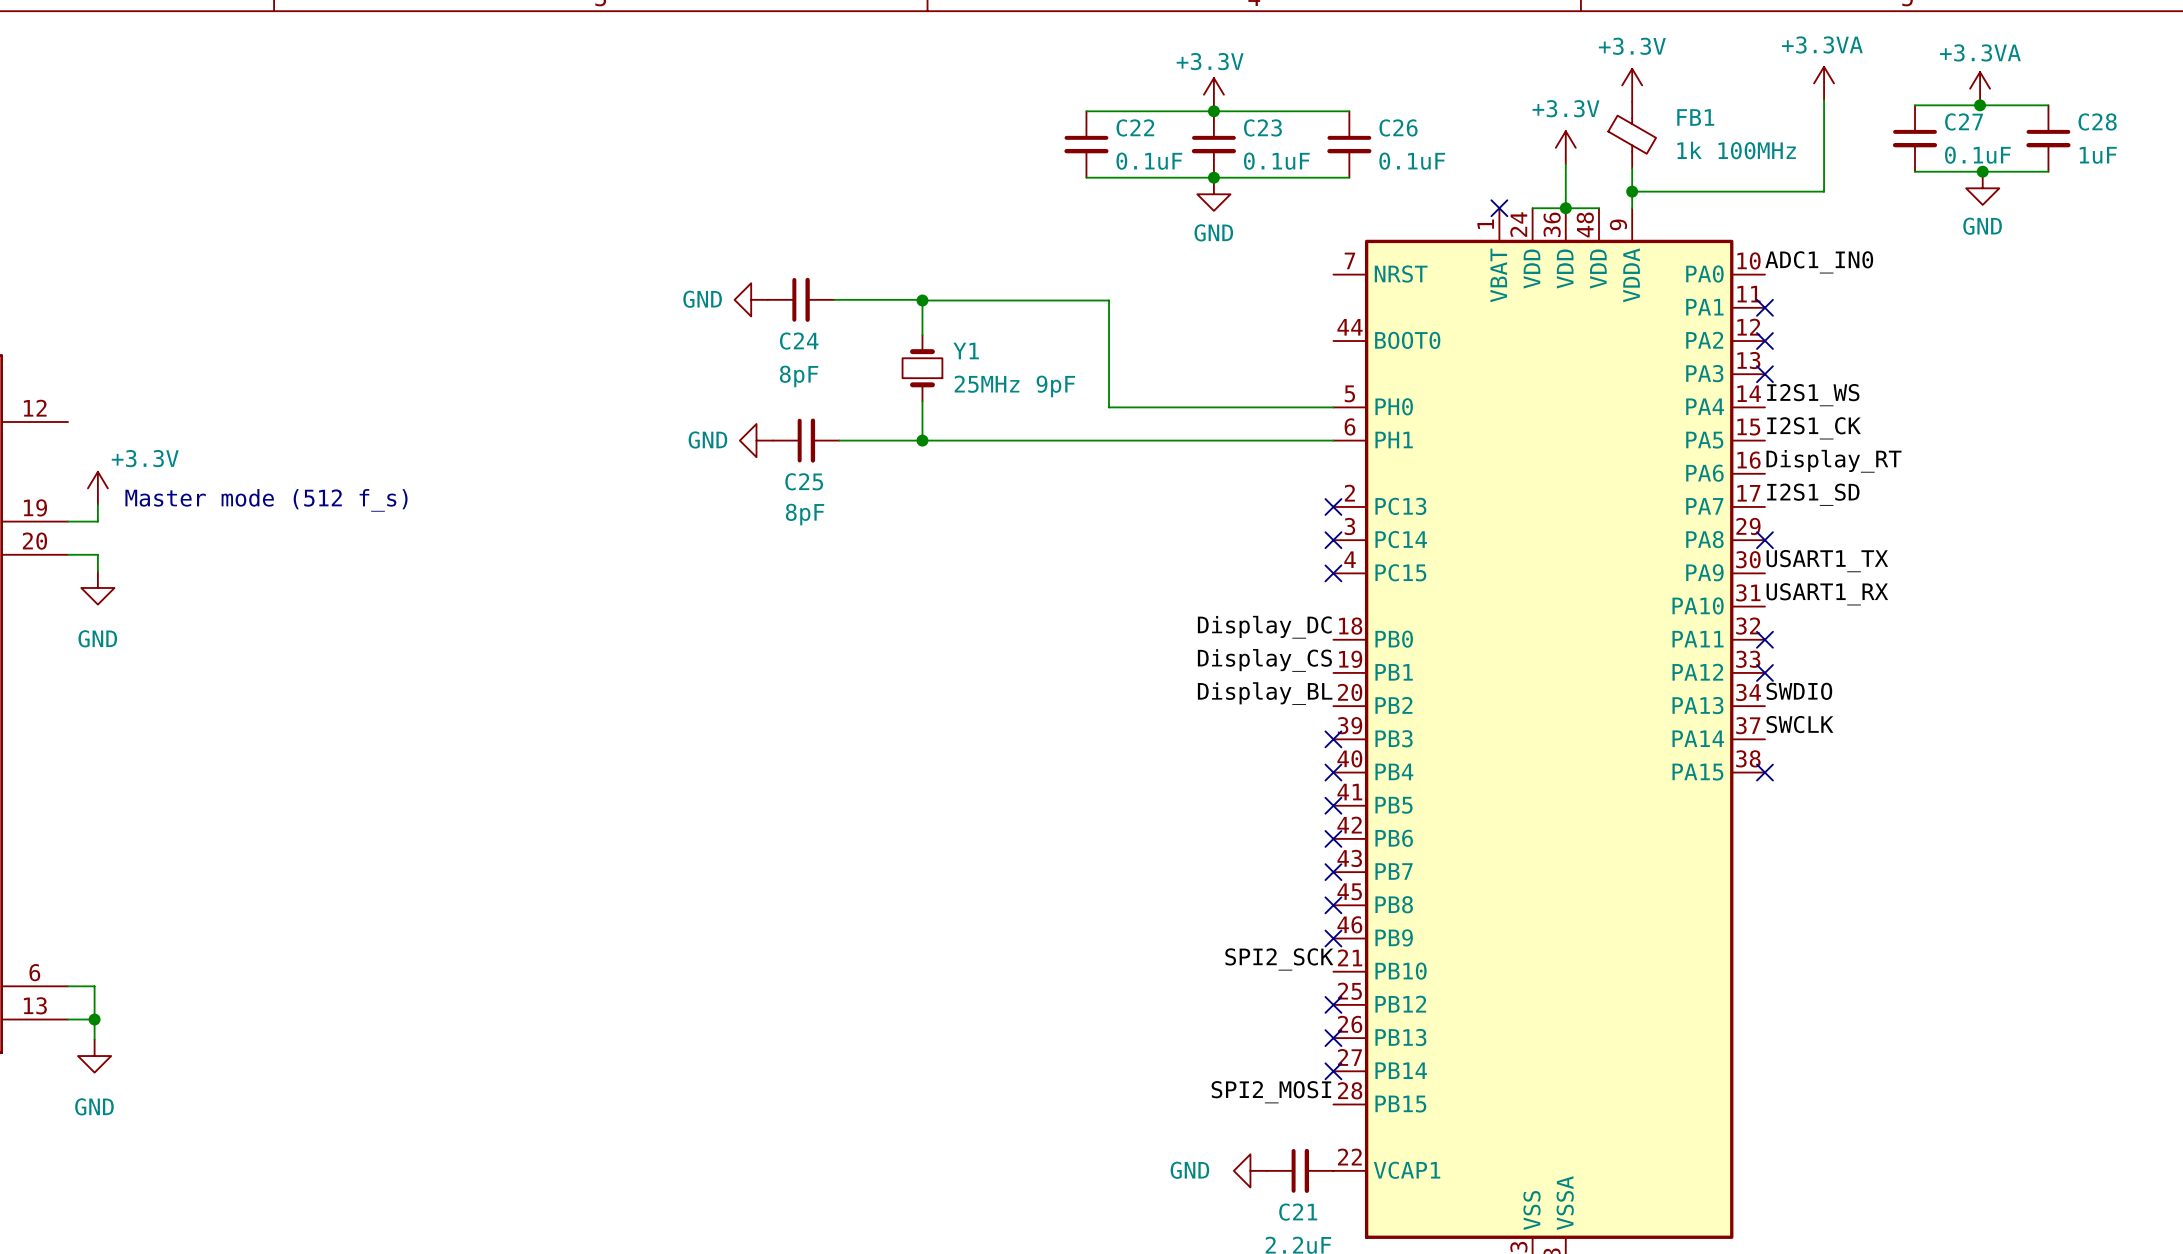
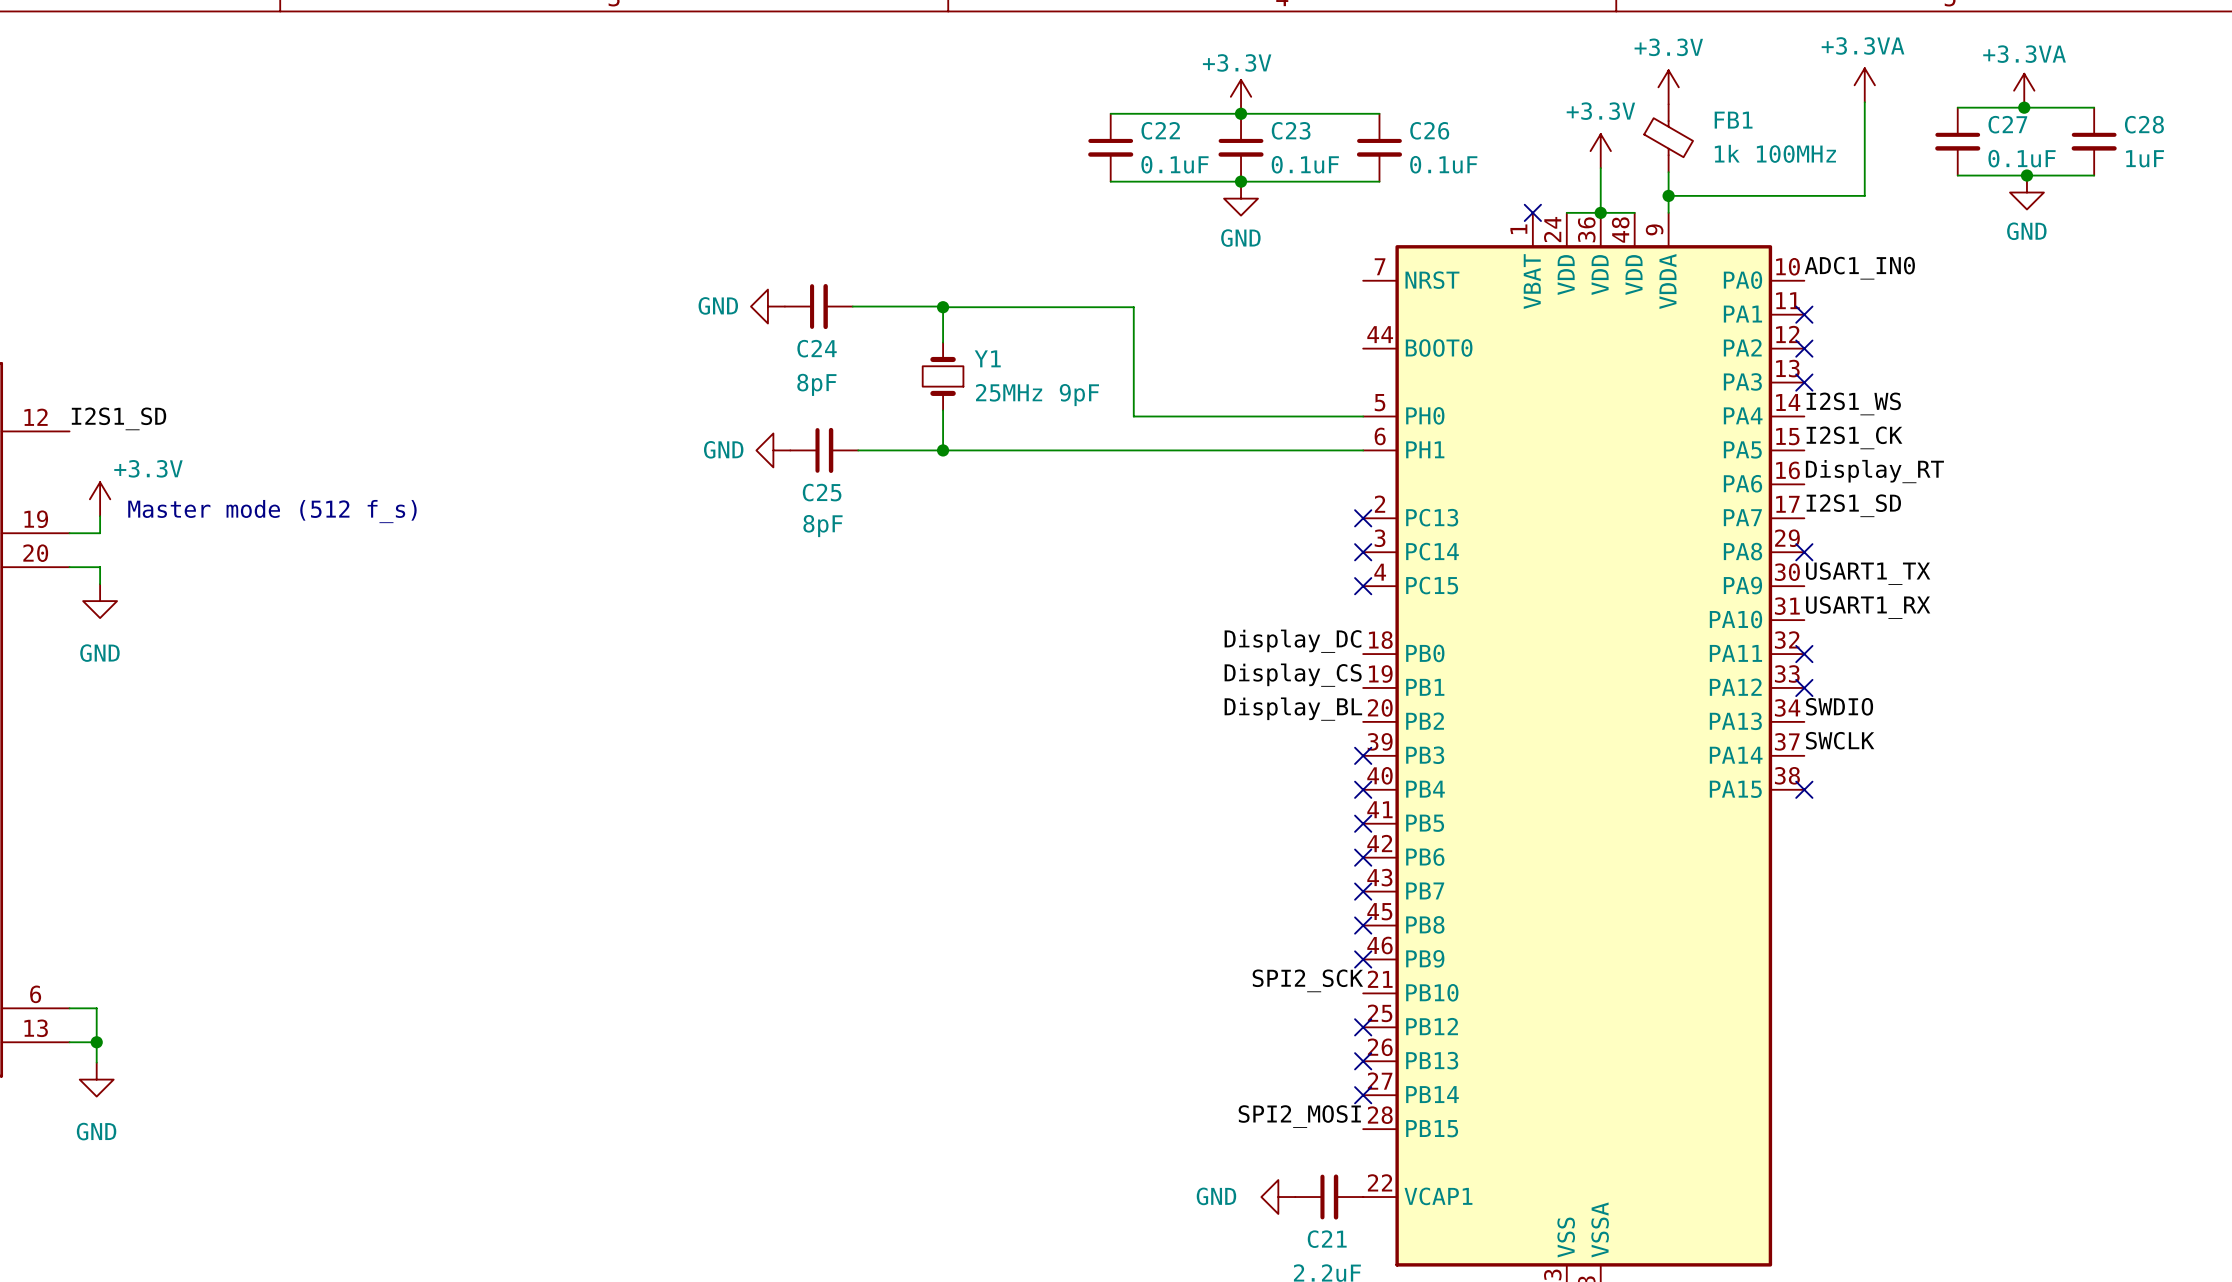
label: none -> I2S1_SD (119, 418)

